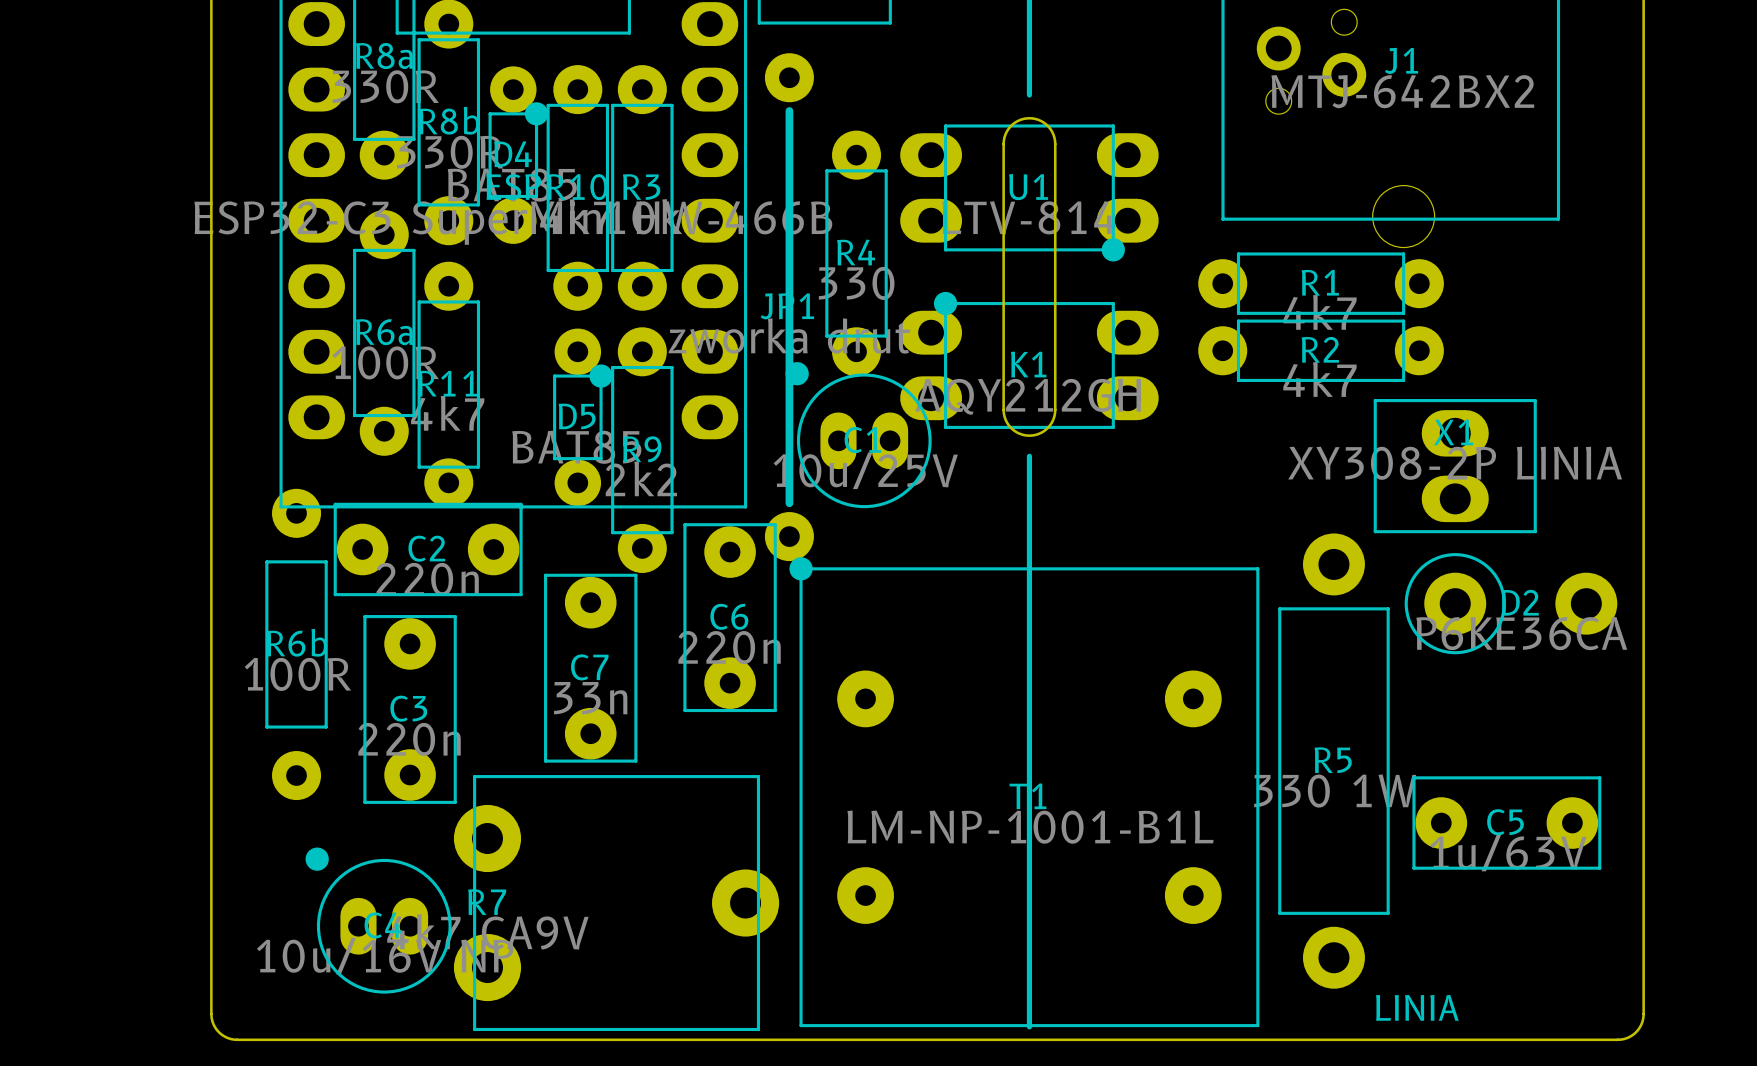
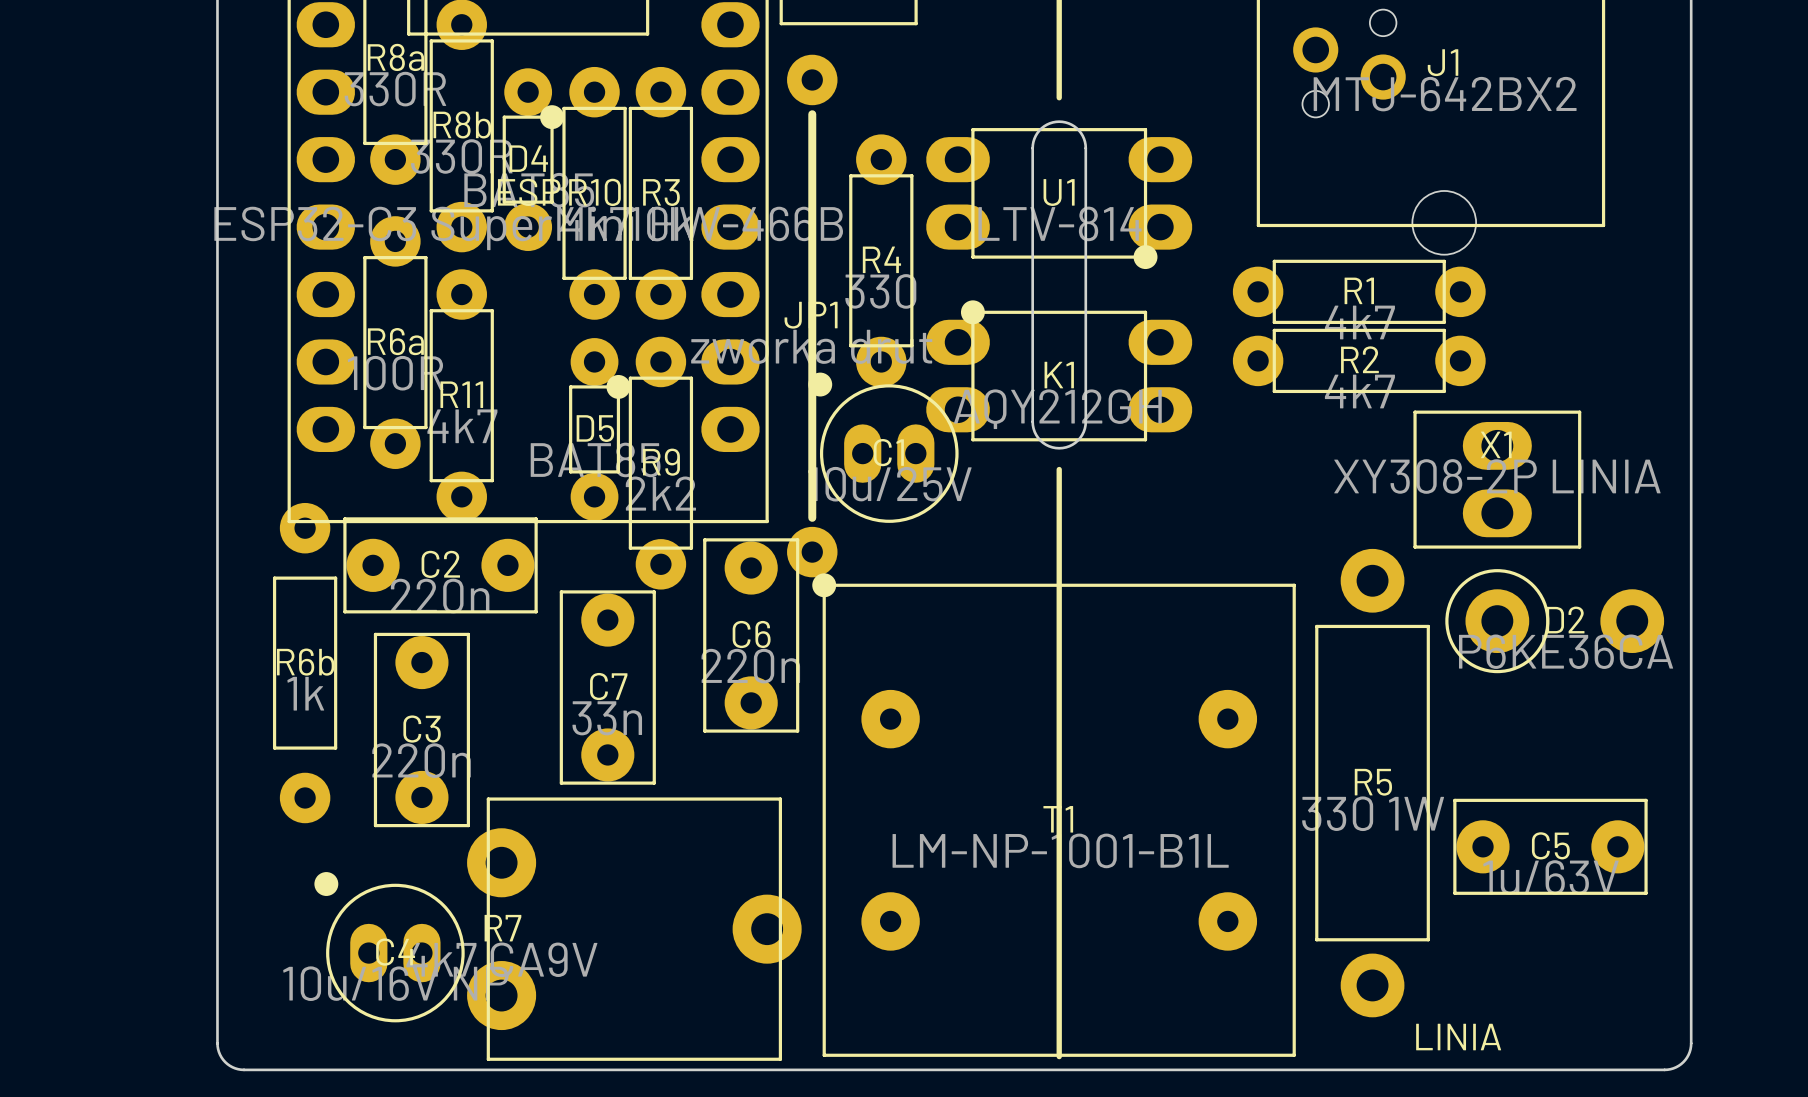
R6b value: 100R (297, 674) -> 1k (305, 693)

